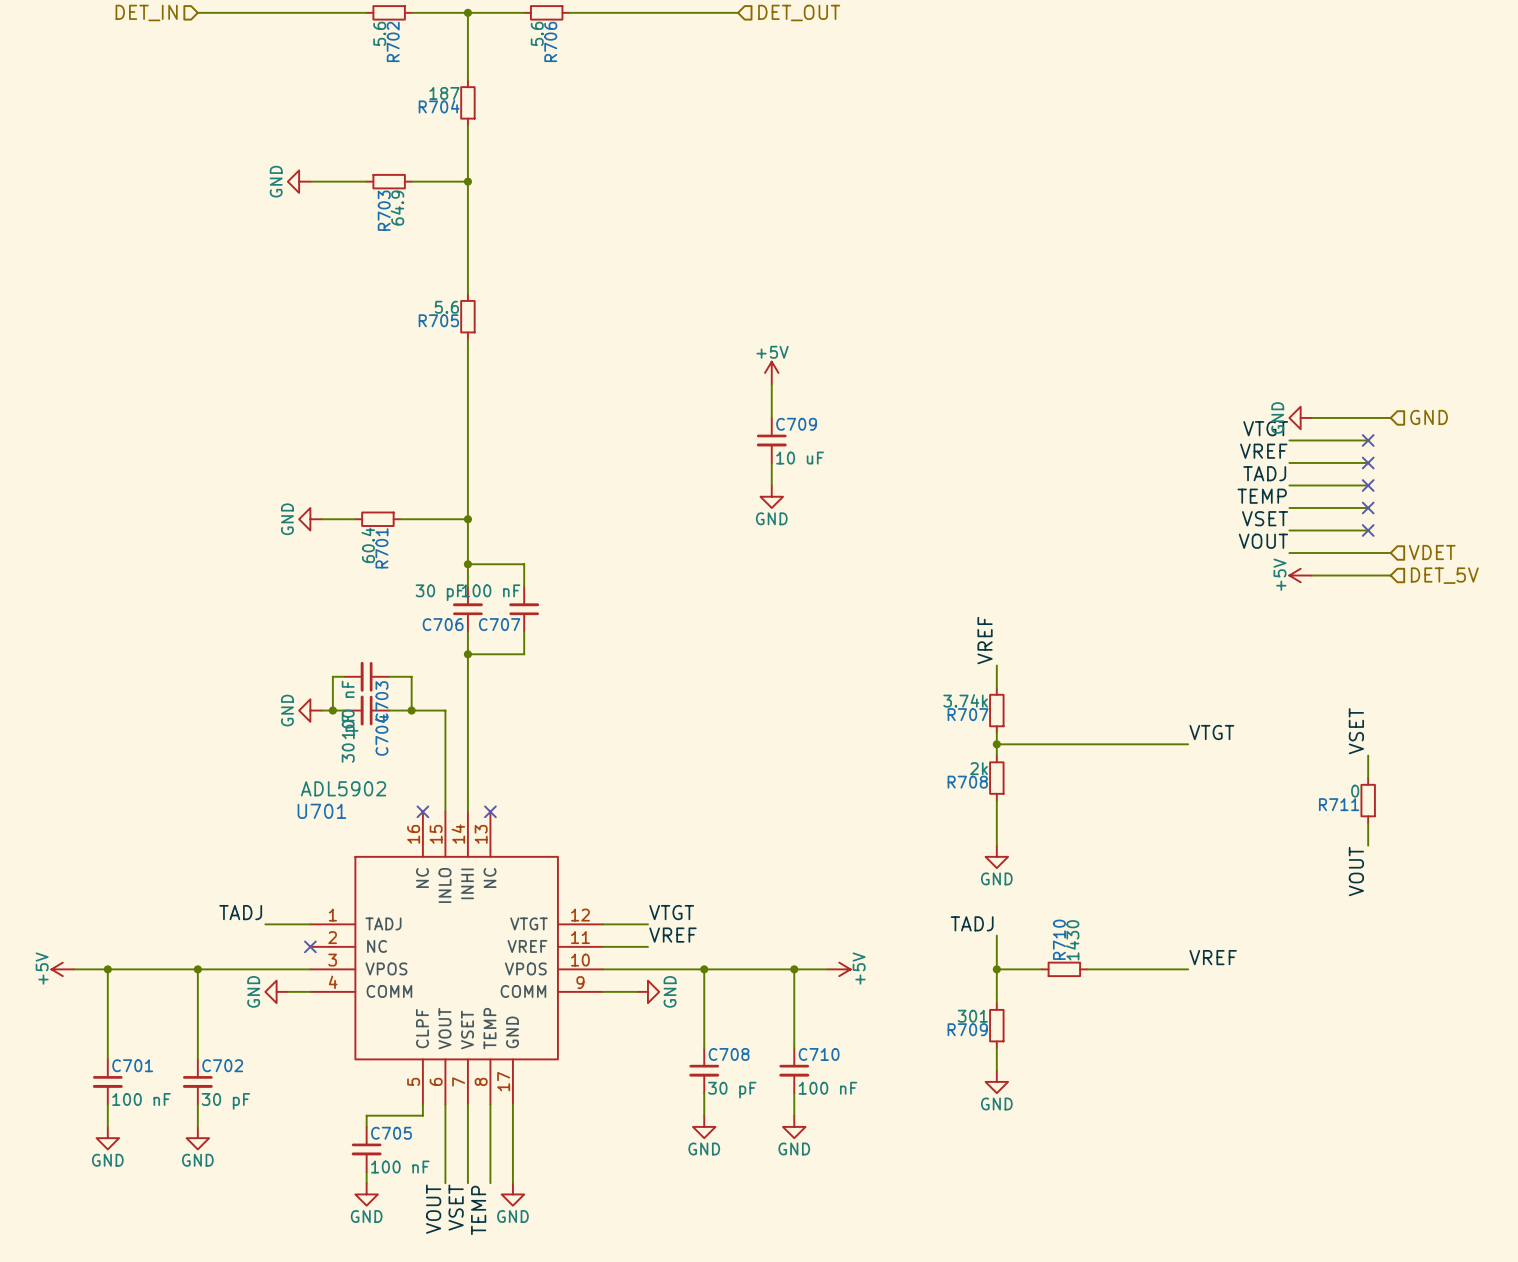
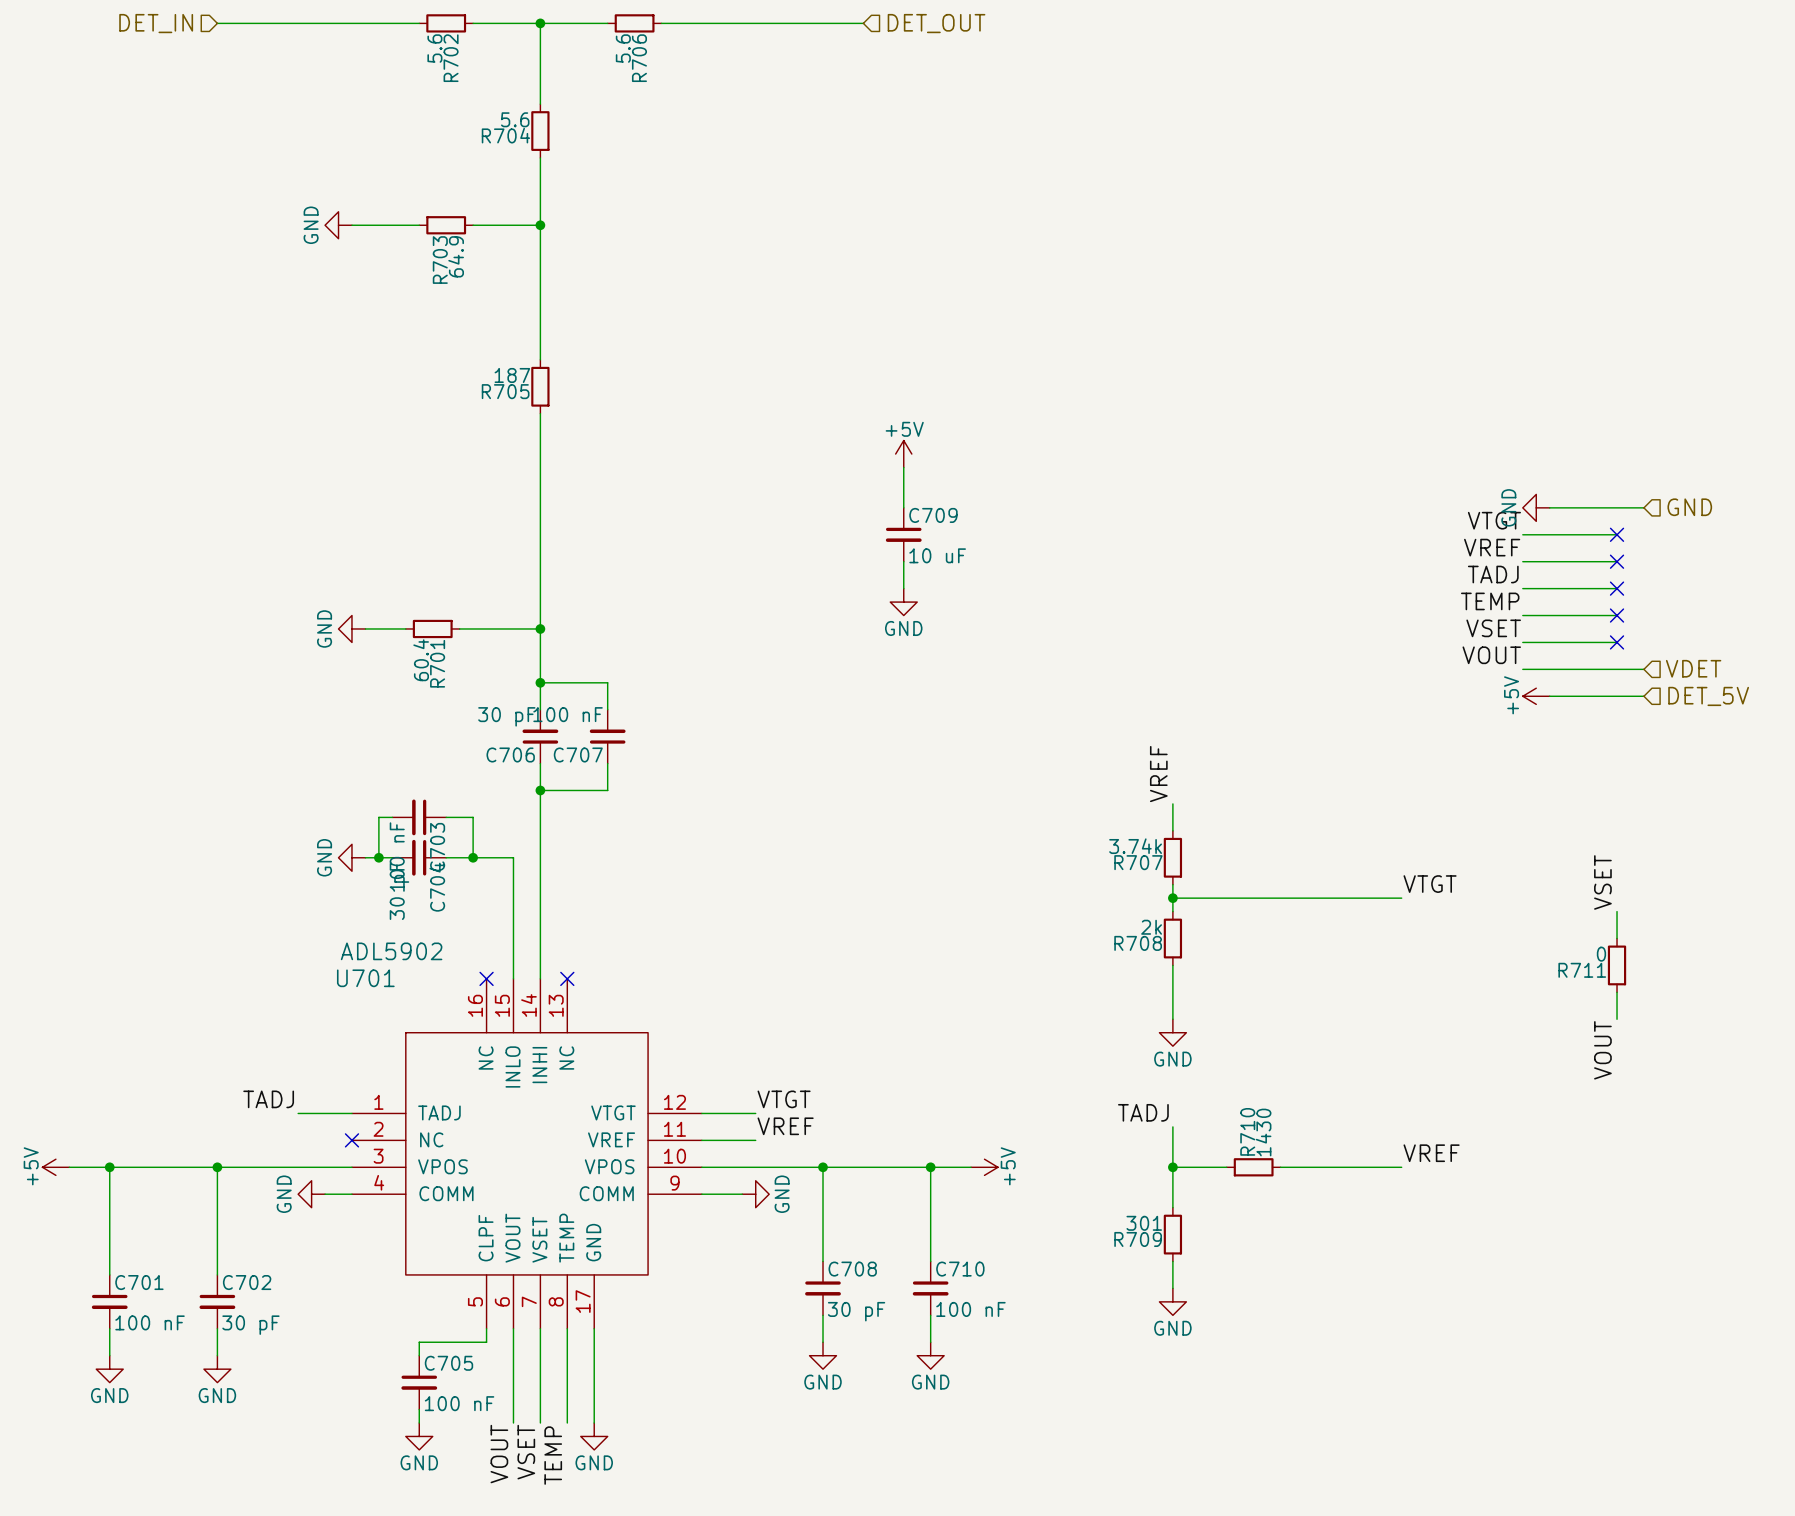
R704 value: 187 (444, 93) -> 5.6 (515, 119)
R705 value: 5.6 (446, 307) -> 187 (512, 375)

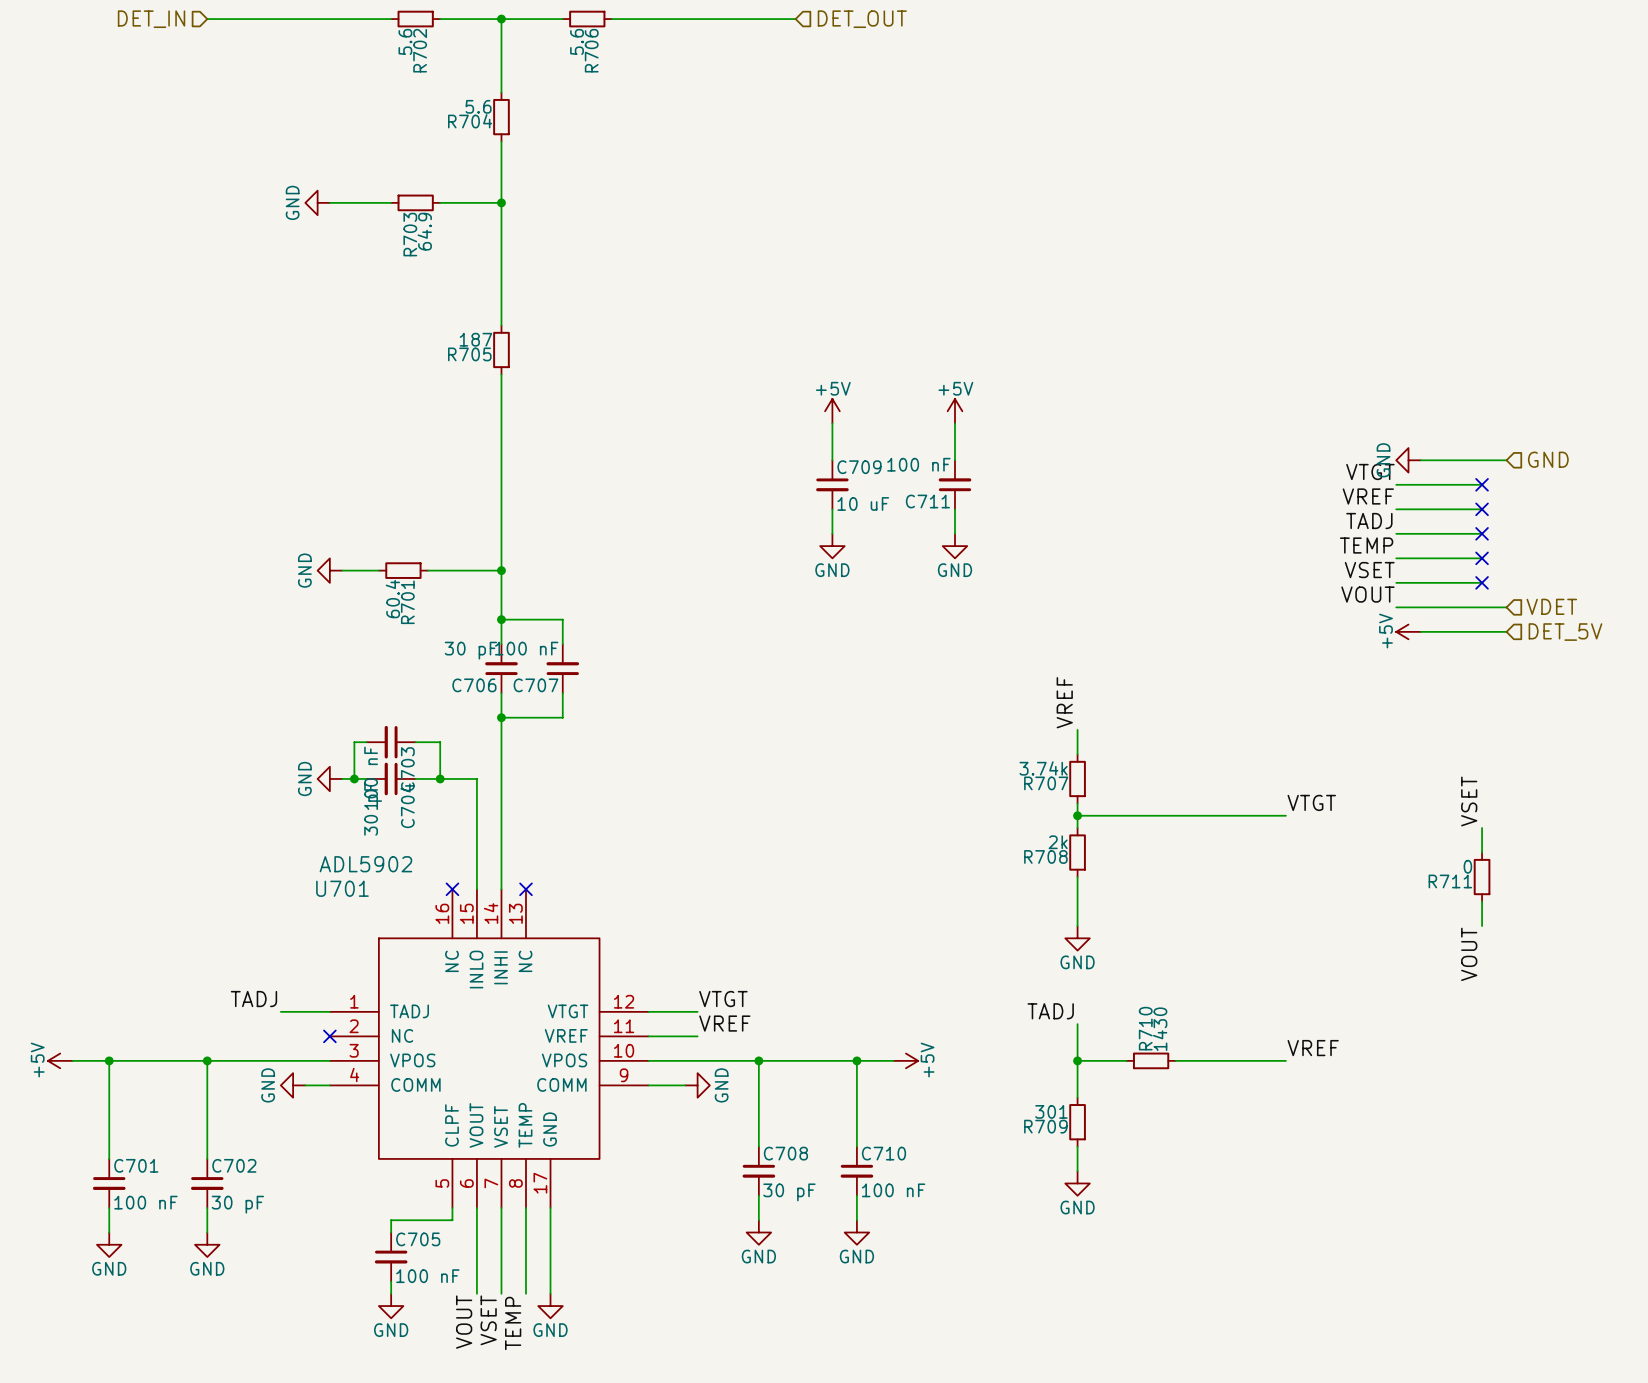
power symbol: none -> +5V (954, 411)
wire: none -> (954, 423) (954, 460)
C711: none -> 100 nF (954, 484)
wire: none -> (954, 509) (954, 533)
power symbol: none -> GND (954, 546)

